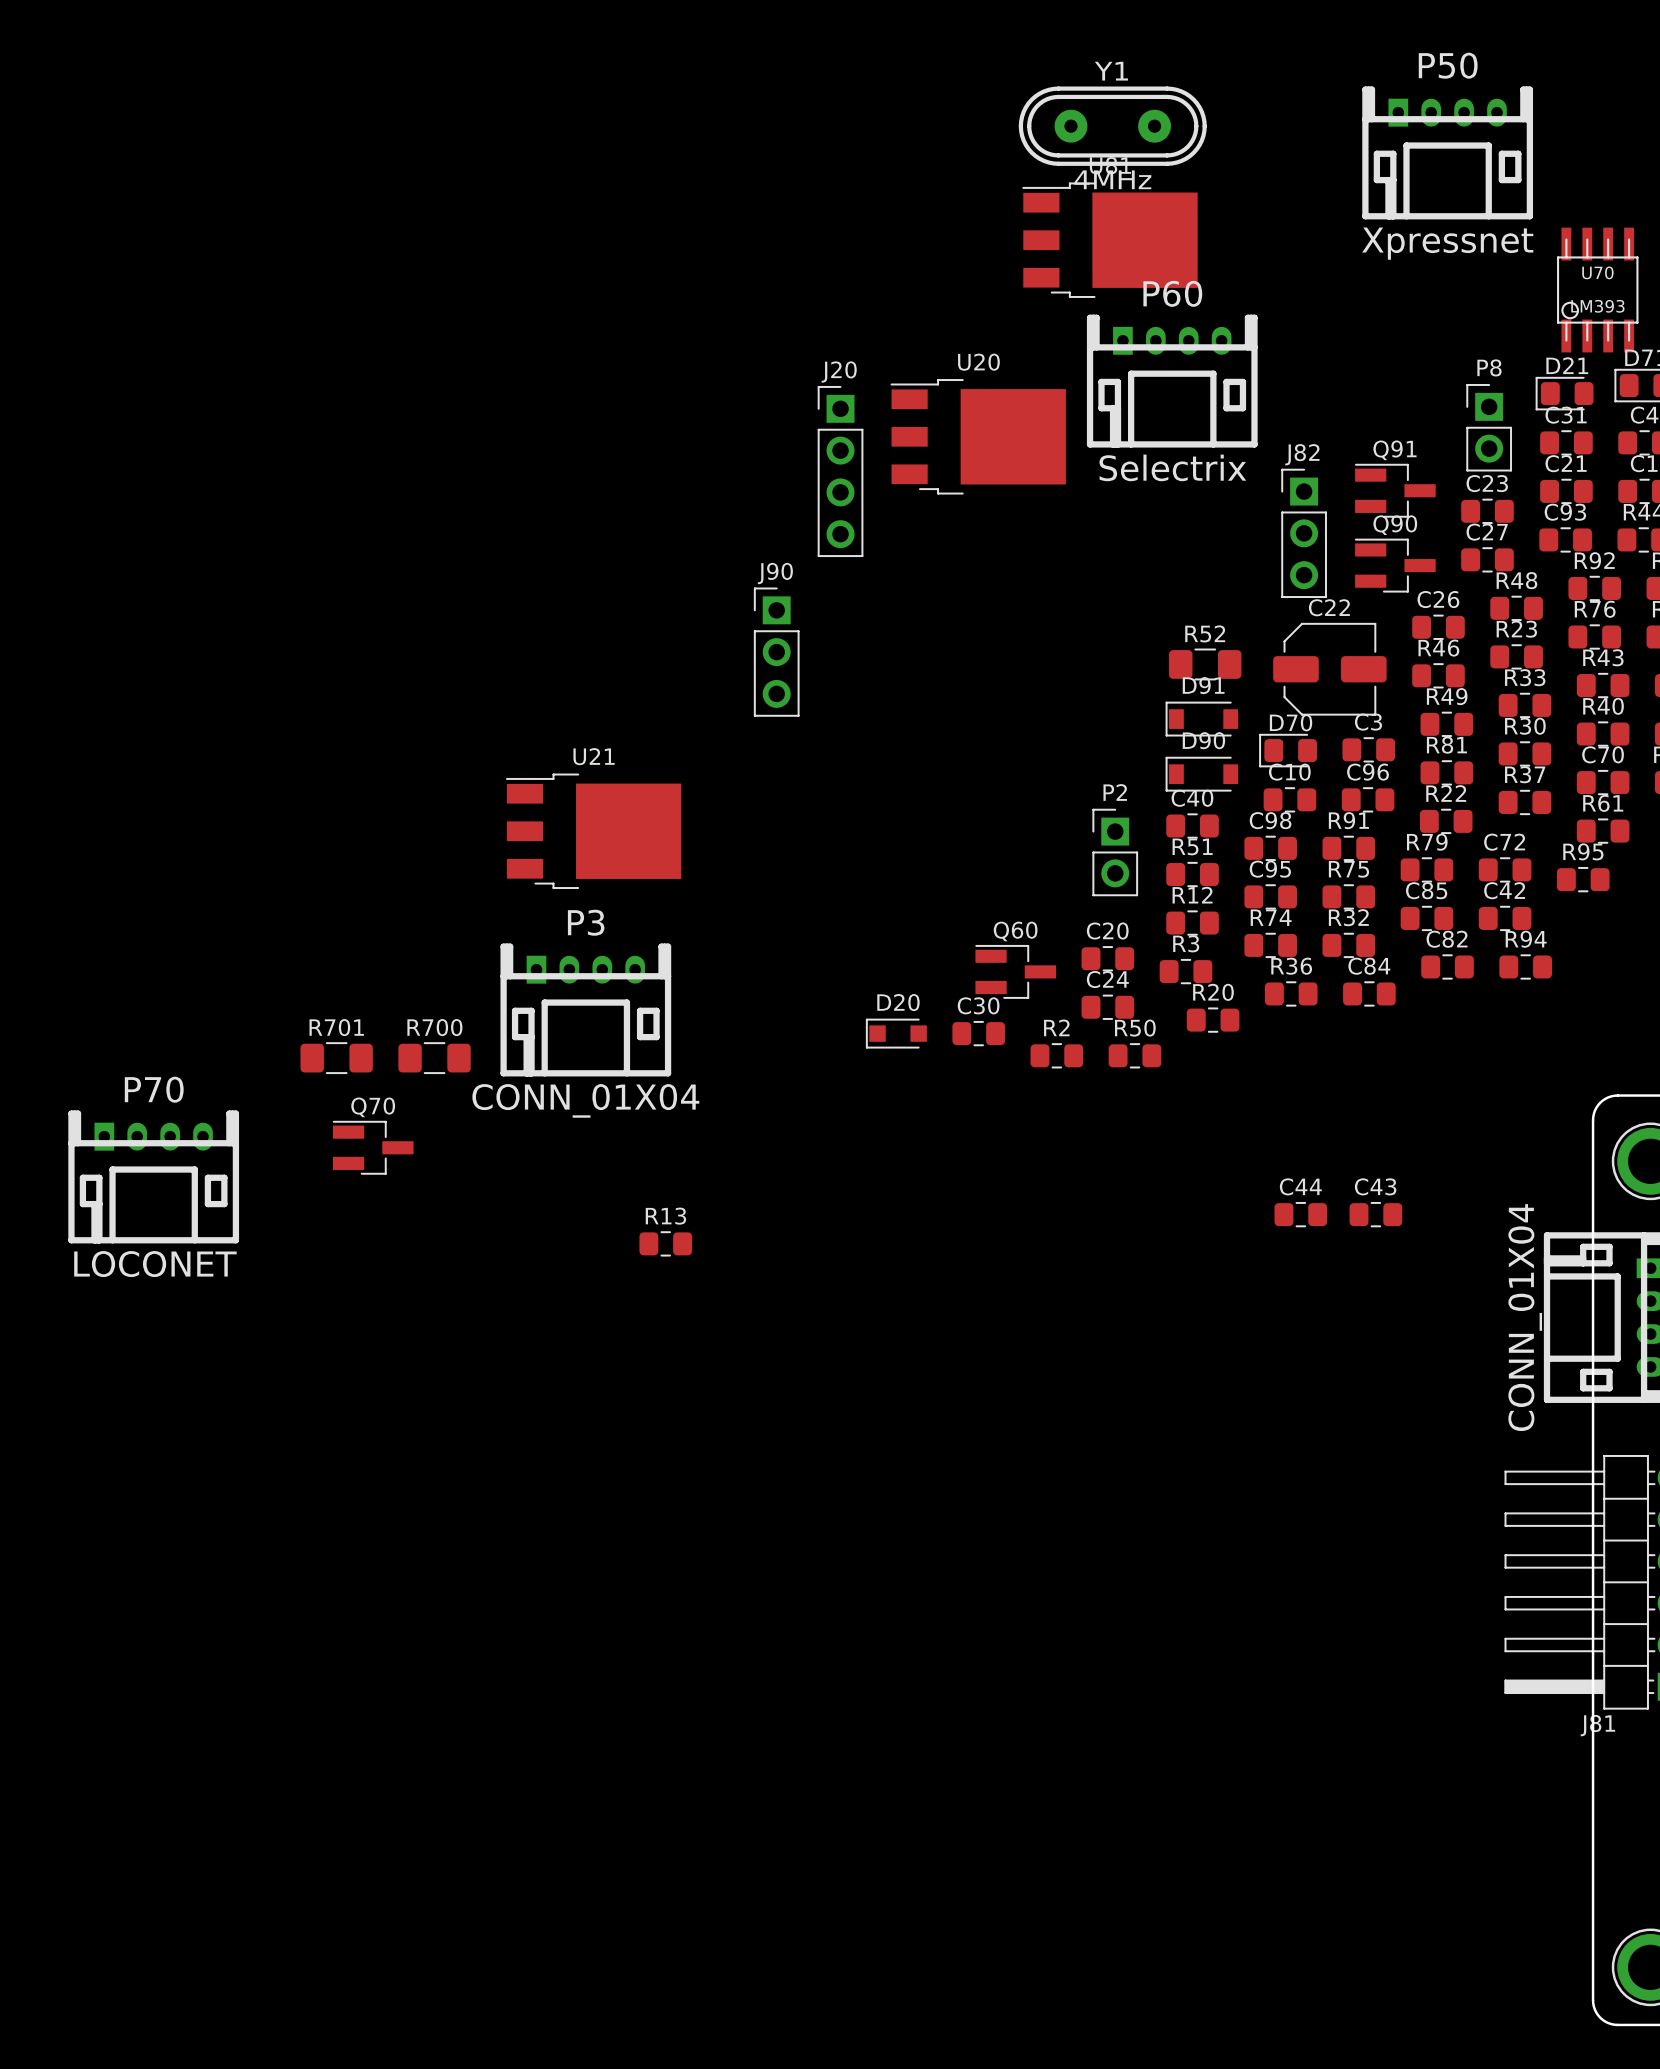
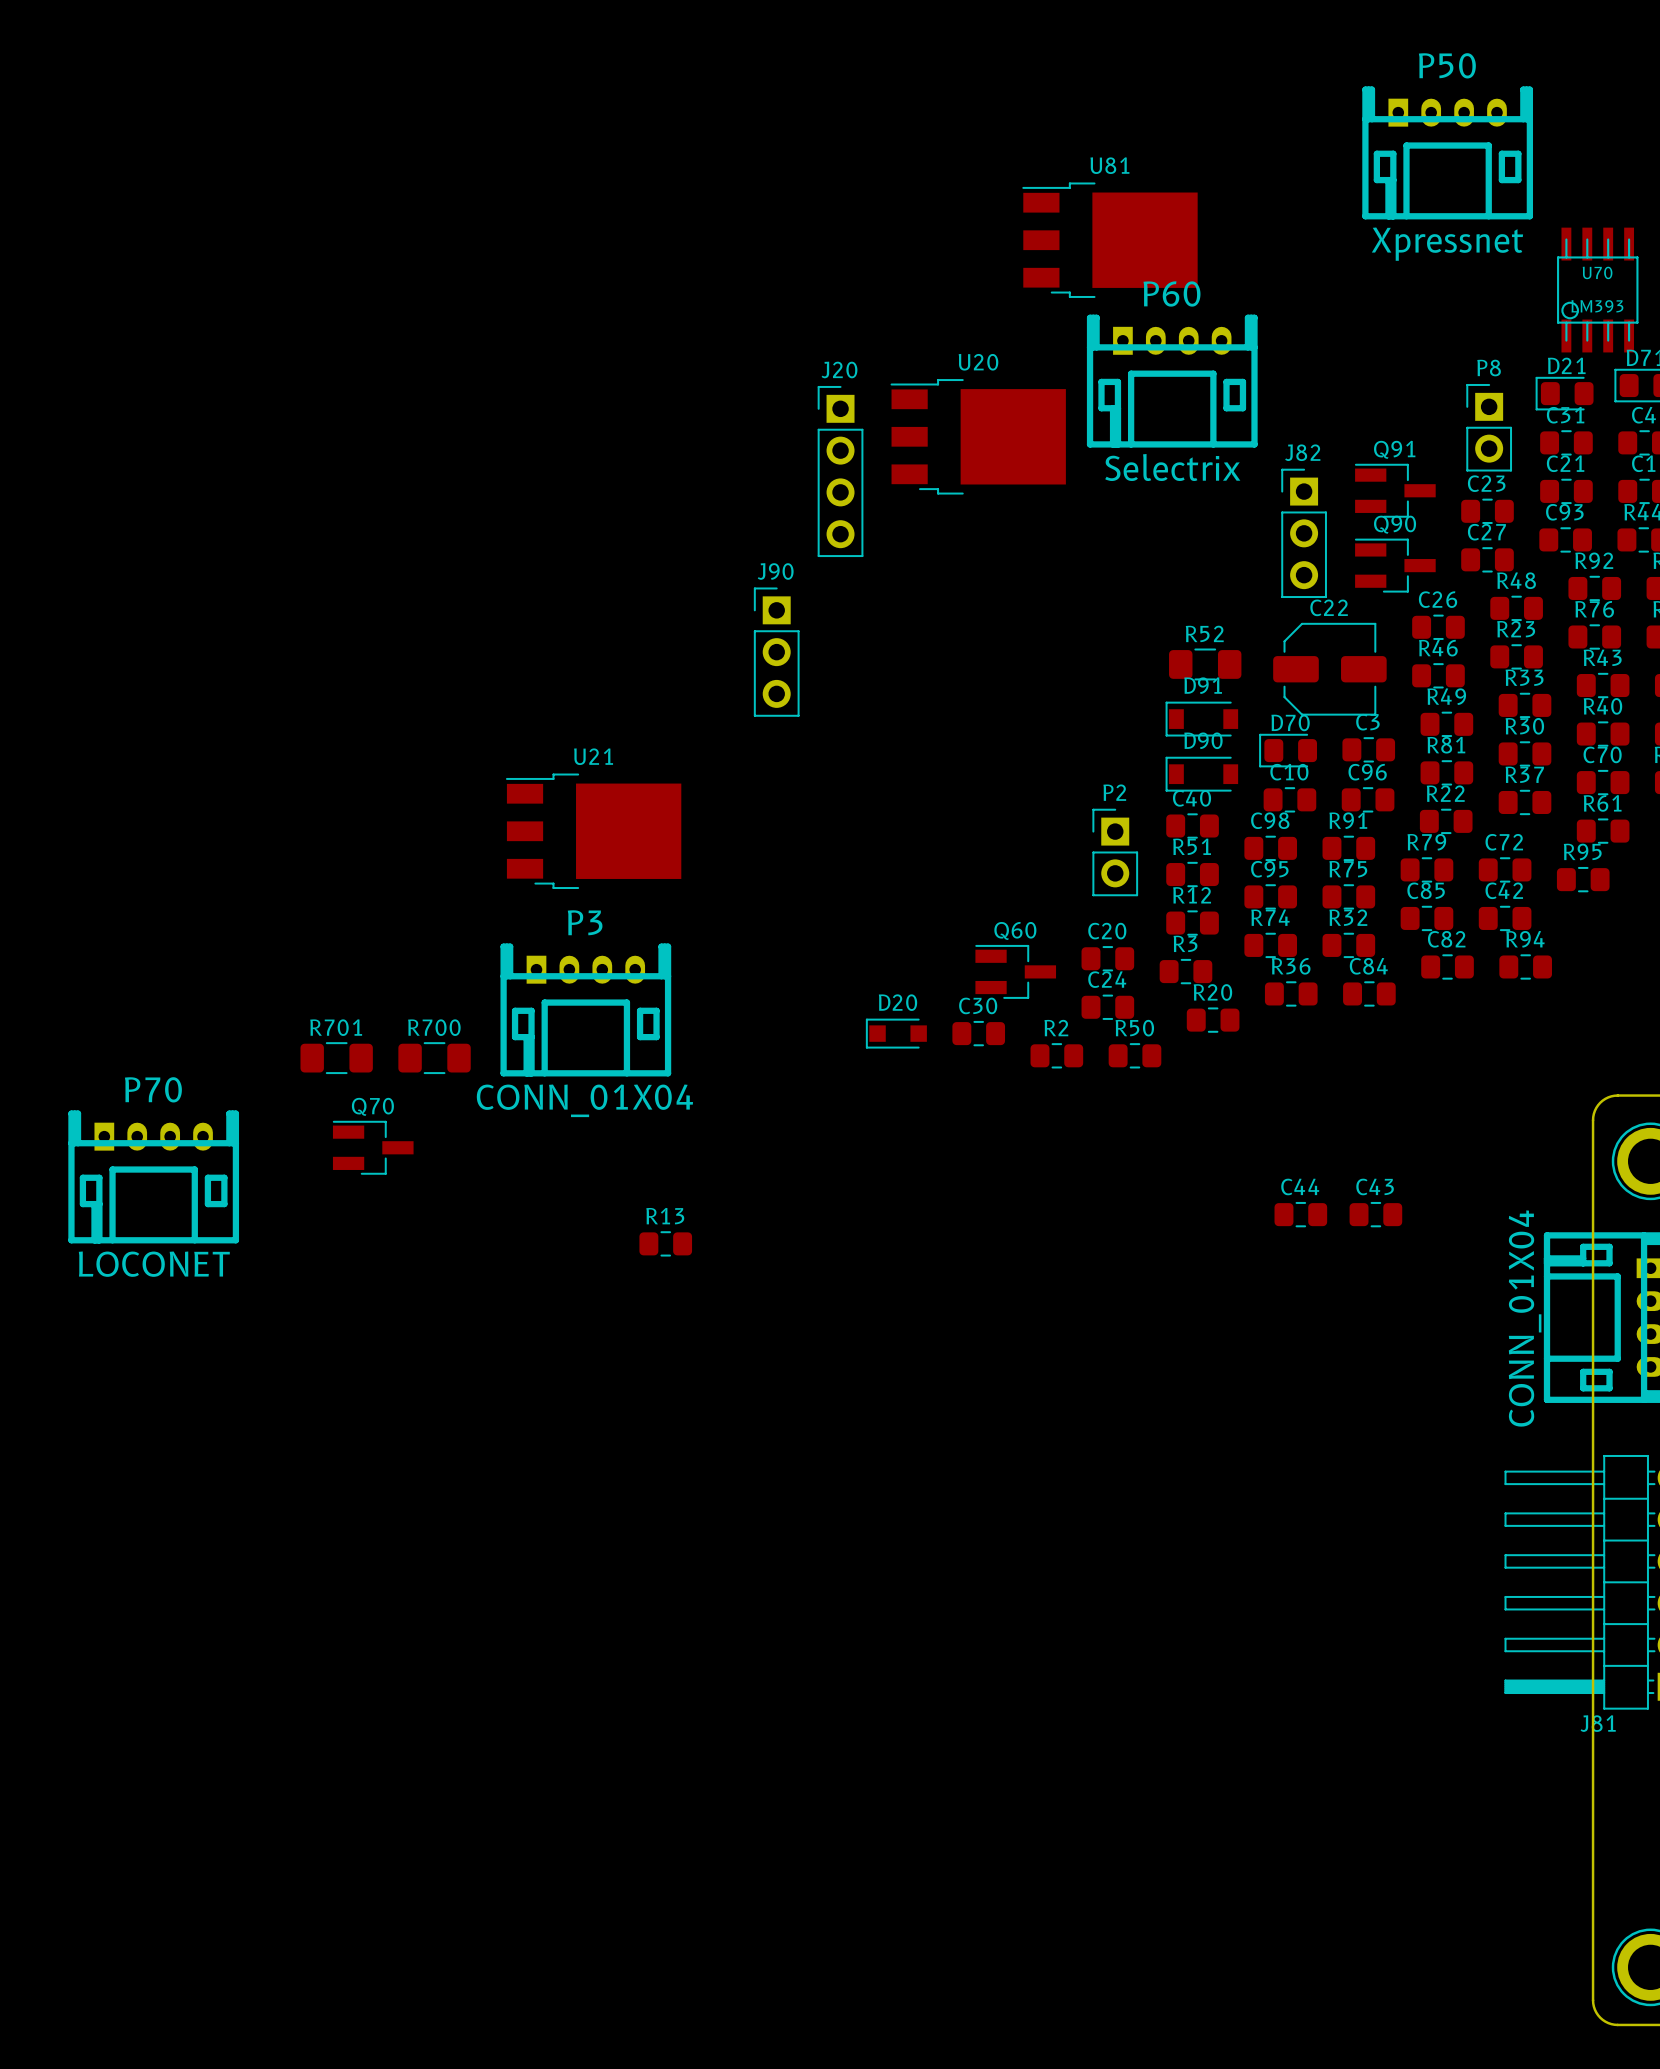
Y1: 4MHz (1112, 126) -> none

